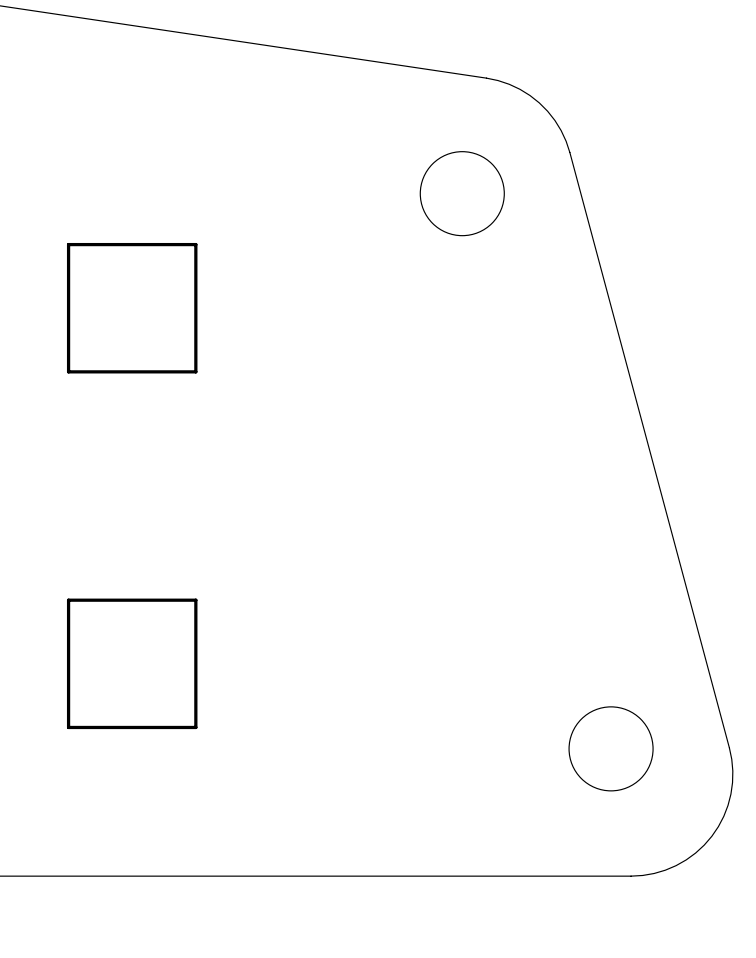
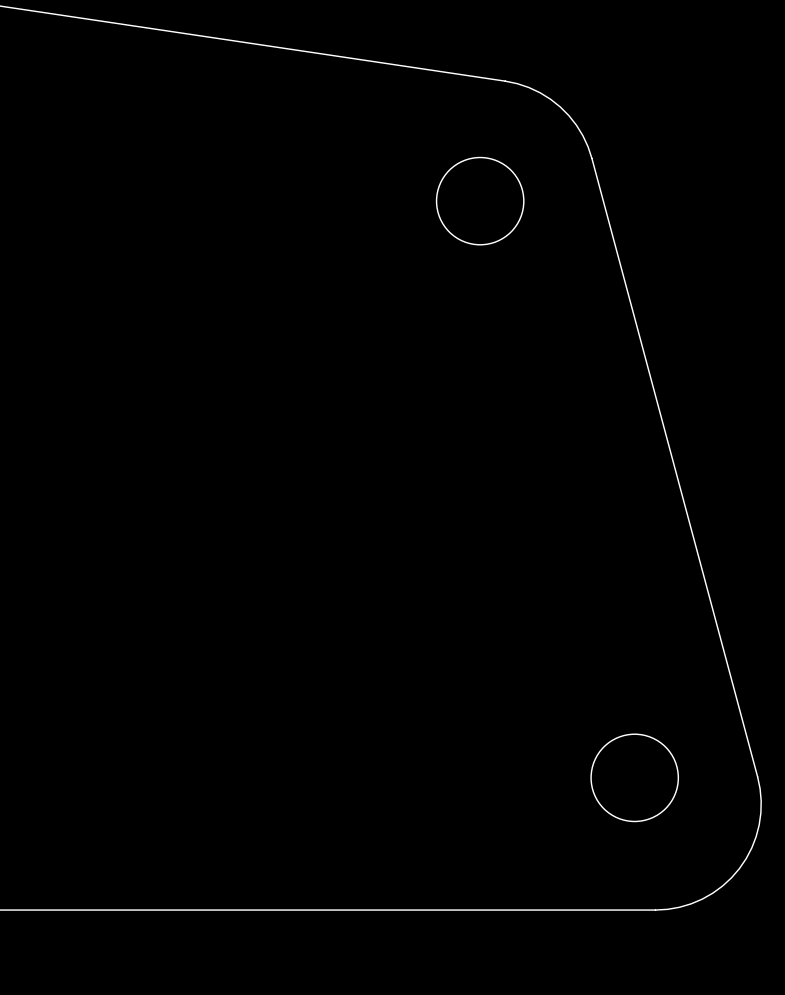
part: (132, 308) -> none
part: (132, 663) -> none

